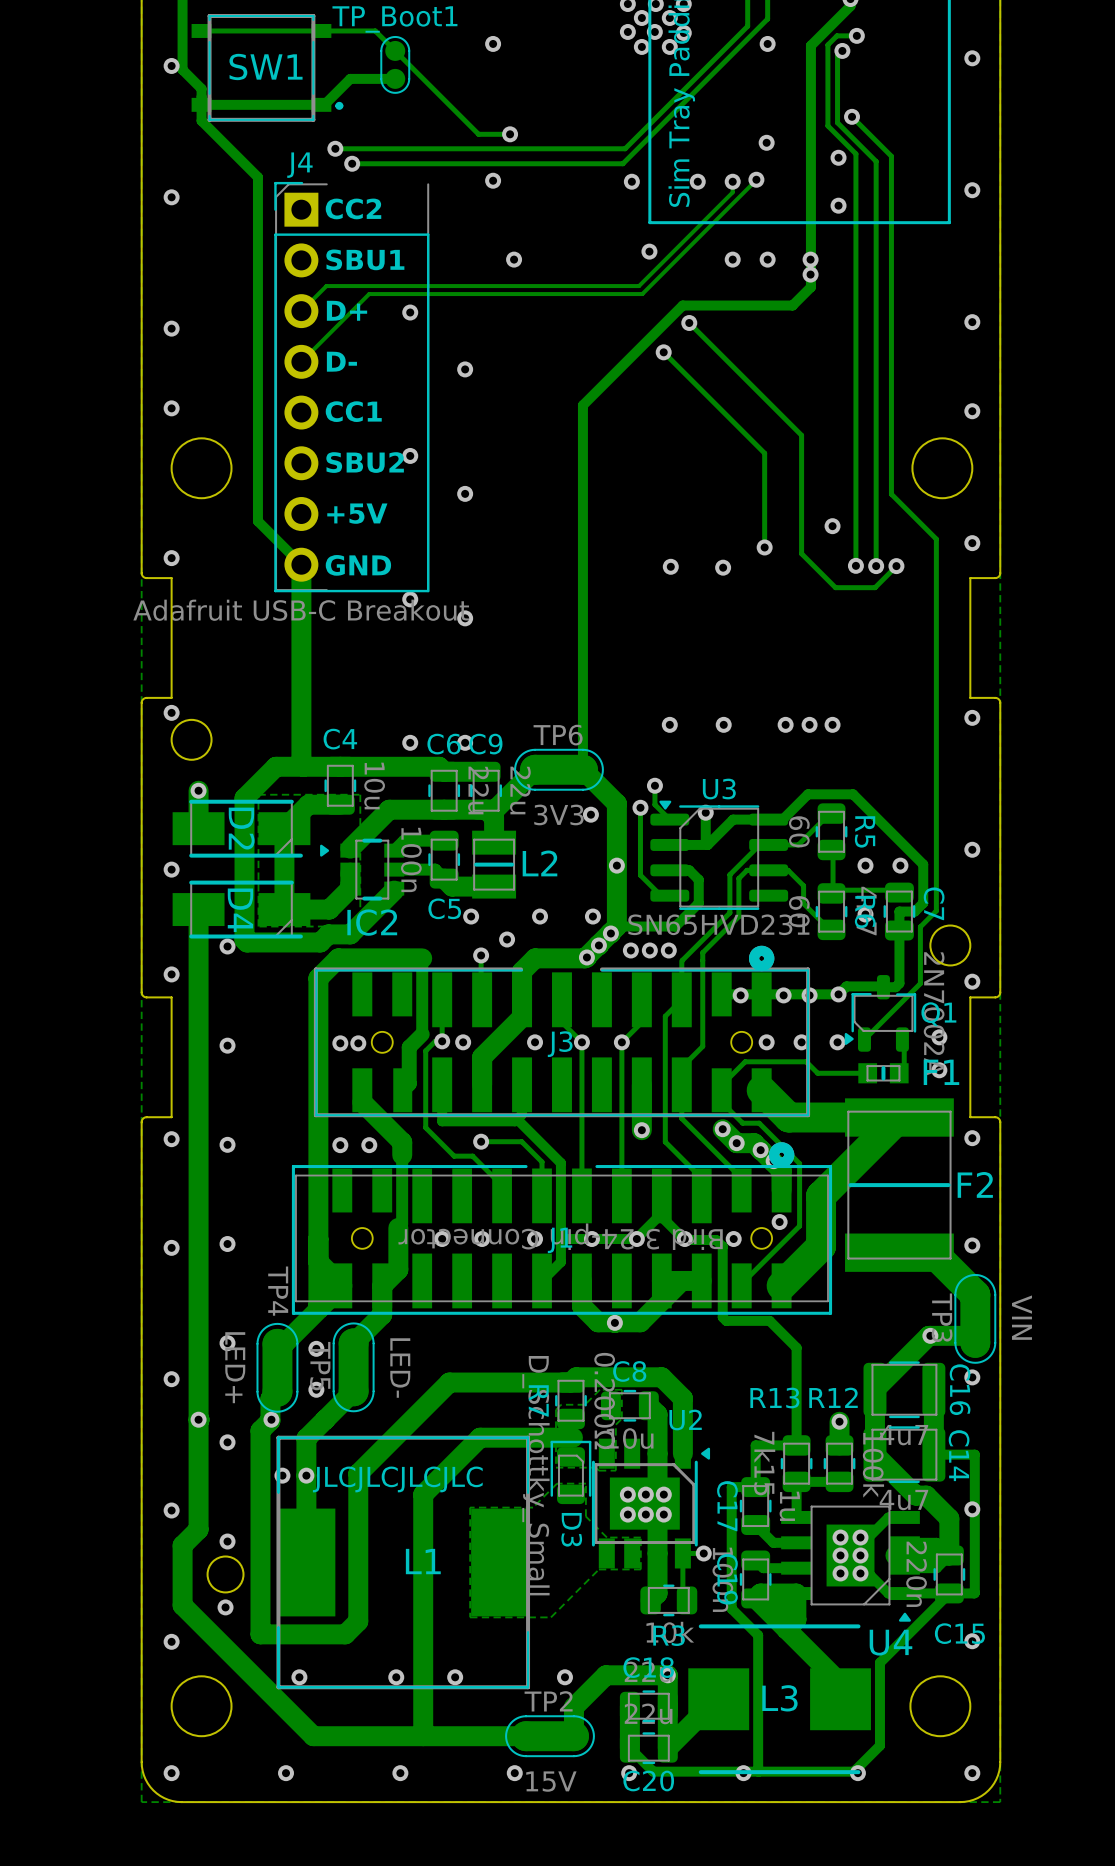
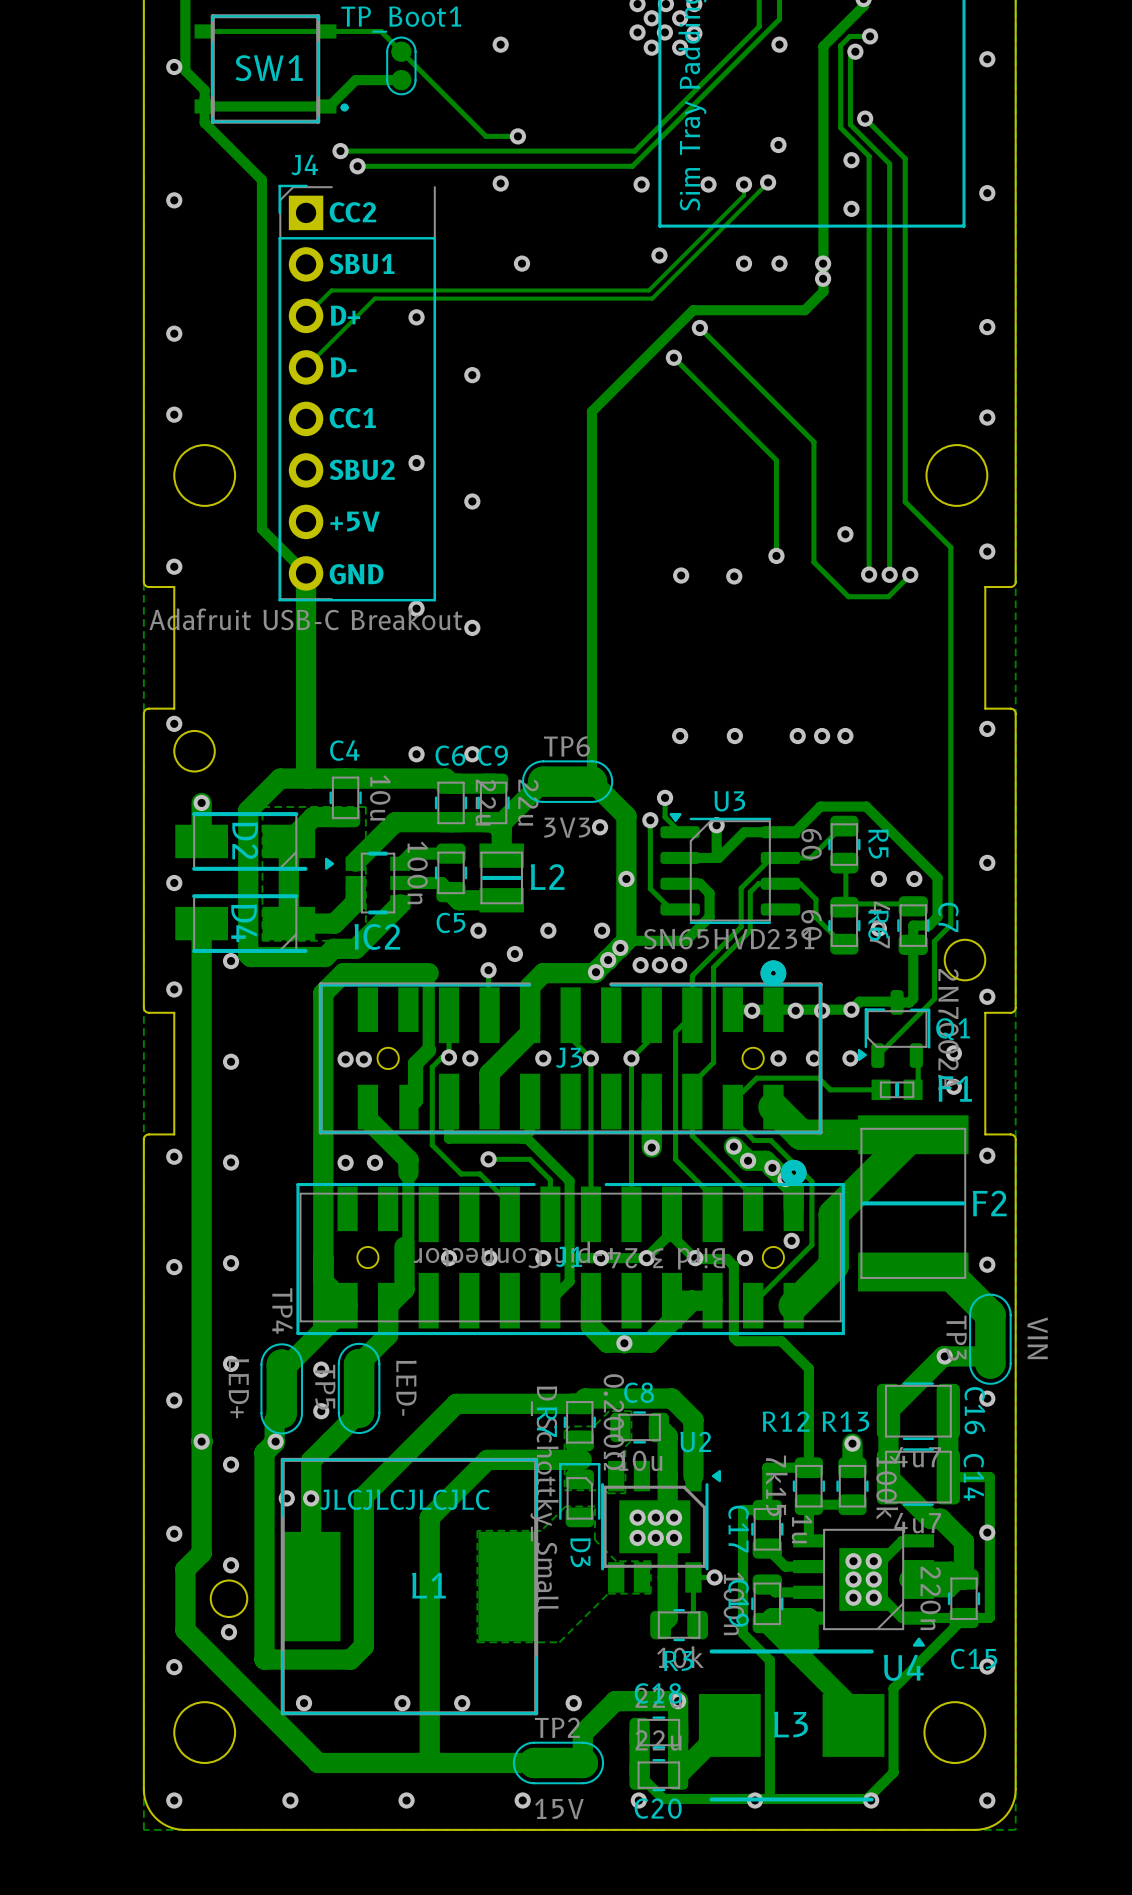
R12 name position: R12 (833, 1397) -> R12 (785, 1421)
R13 name position: R13 (774, 1398) -> R13 (845, 1421)

